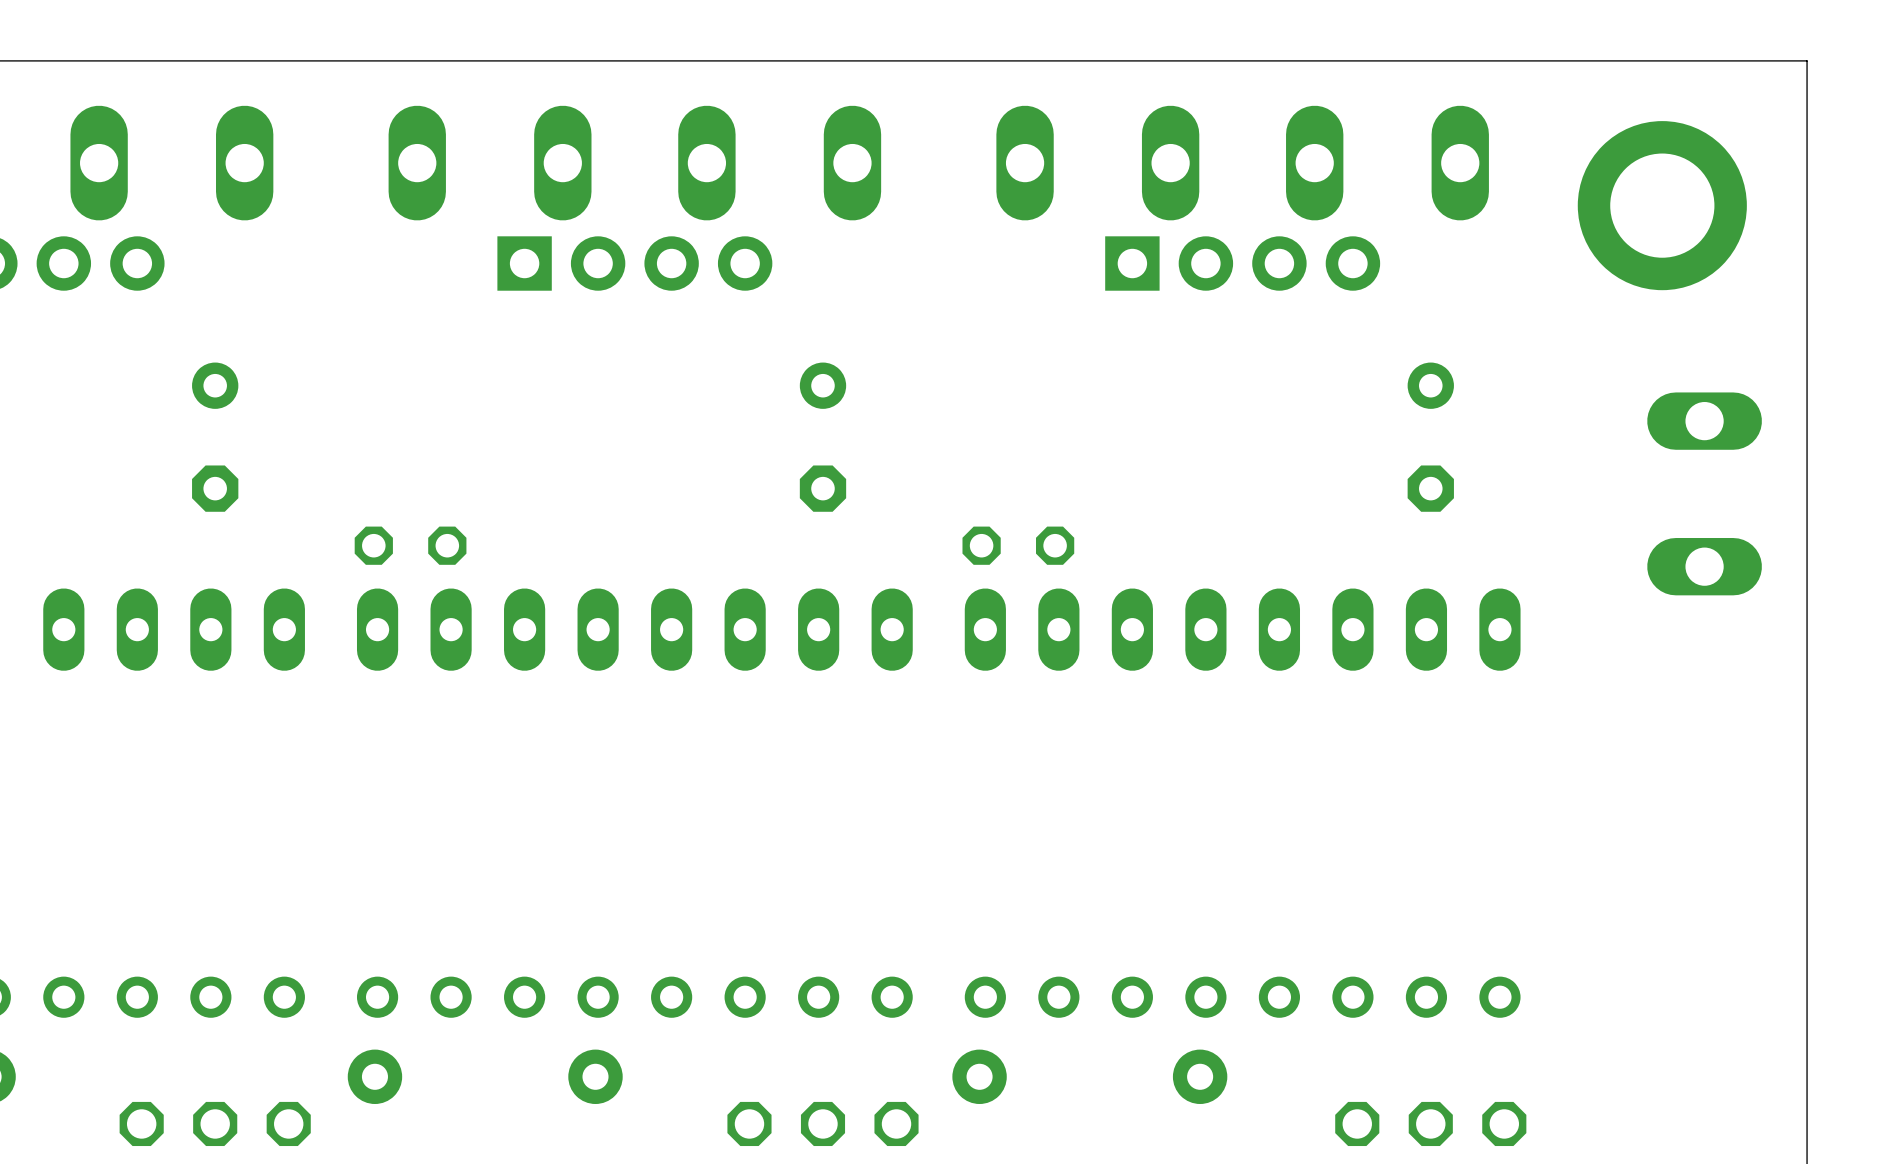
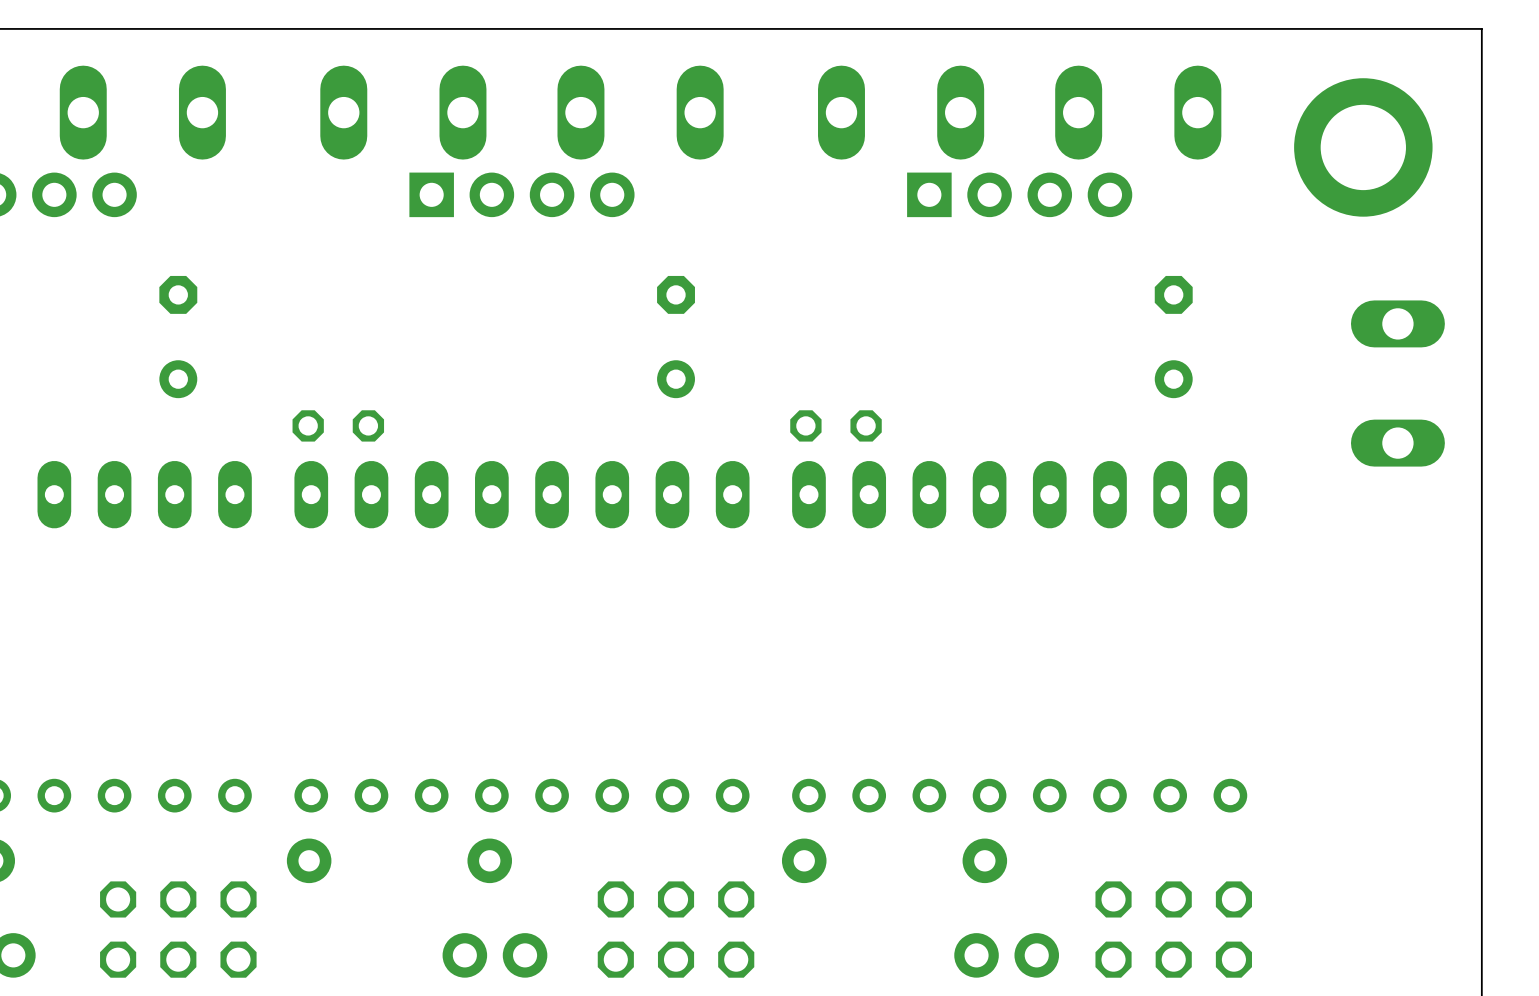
part rotation: 0° (215, 437) -> 180° (178, 337)
part rotation: 0° (822, 437) -> 180° (676, 337)
part rotation: 0° (1430, 437) -> 180° (1173, 337)

